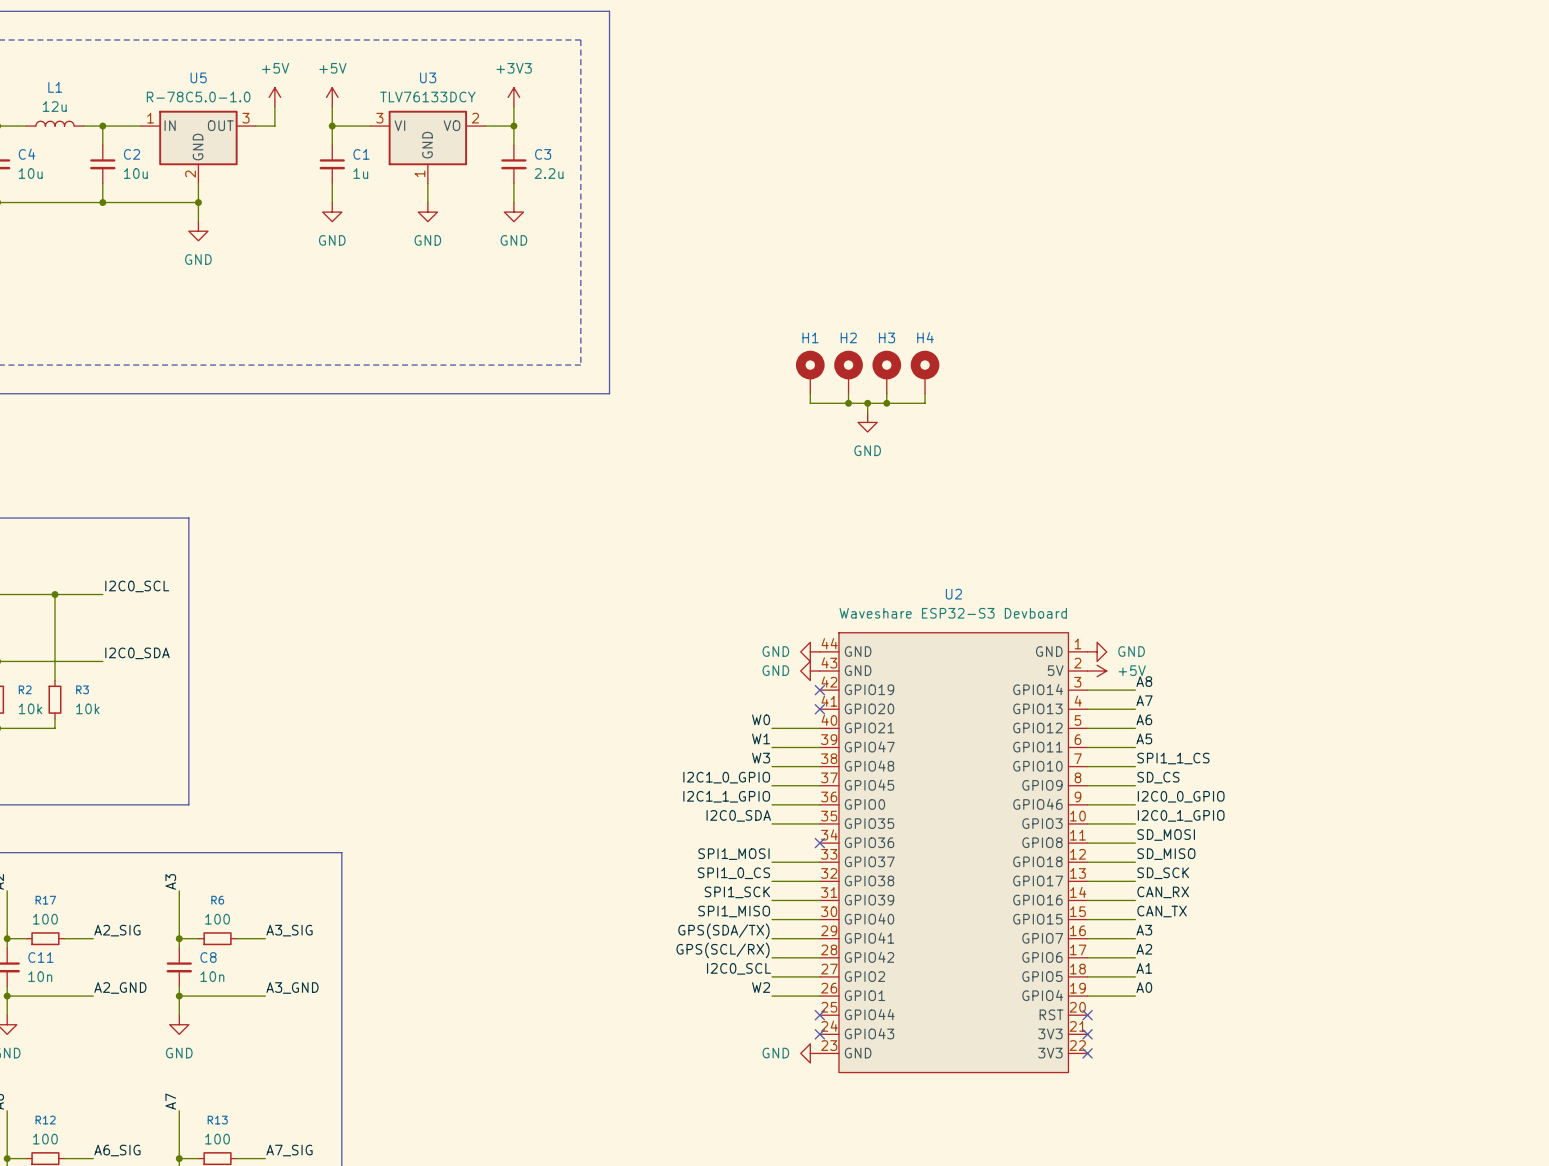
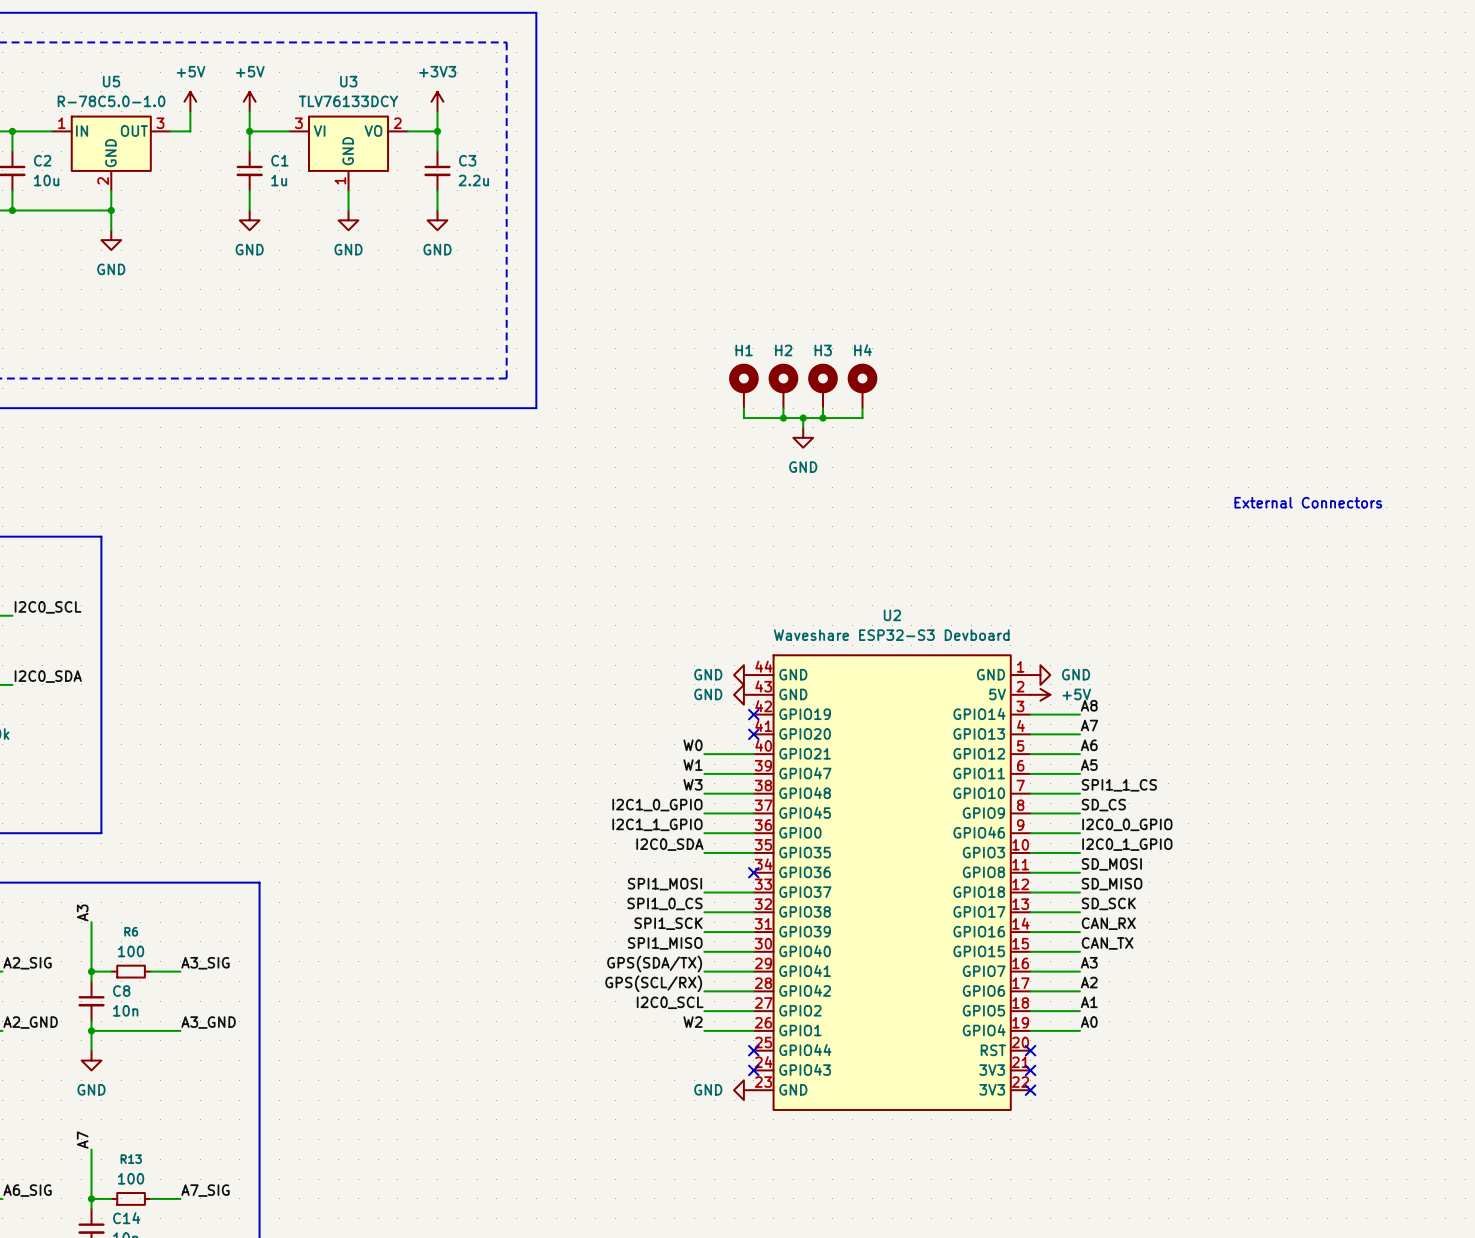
text: none -> External Connectors (1308, 502)

